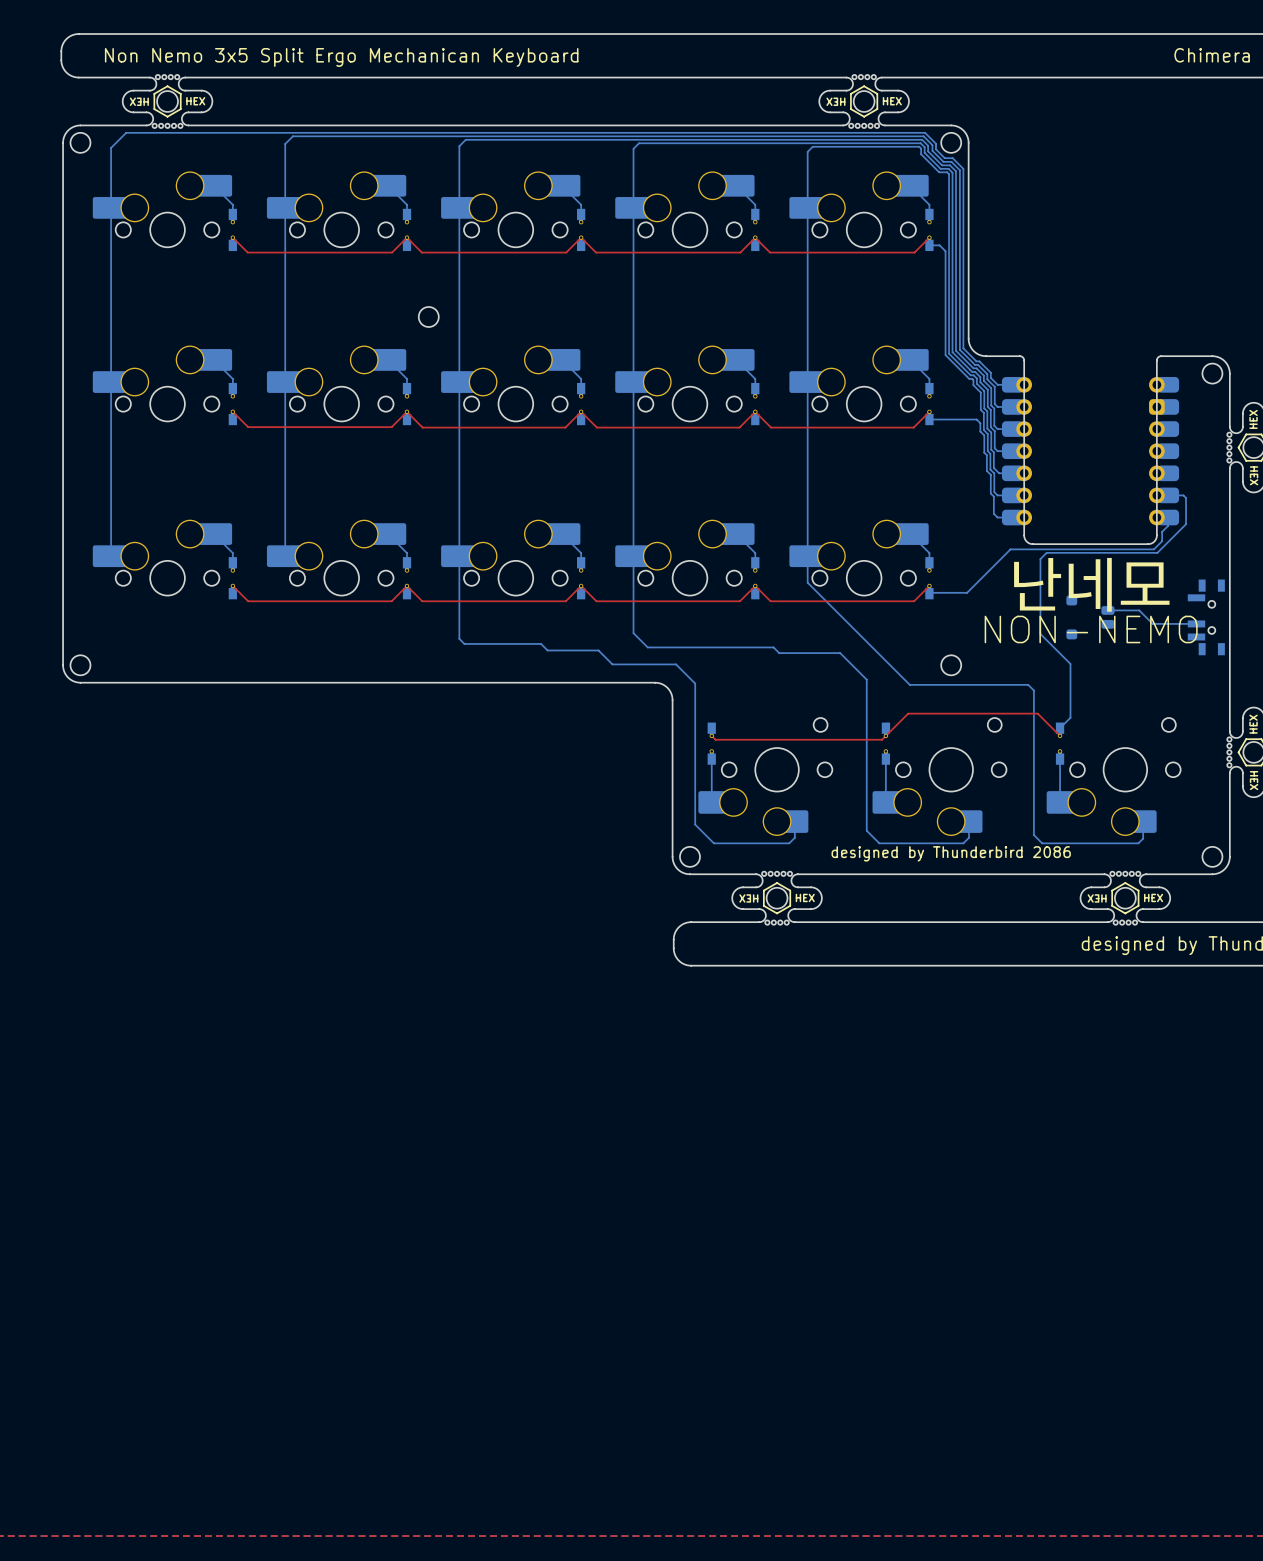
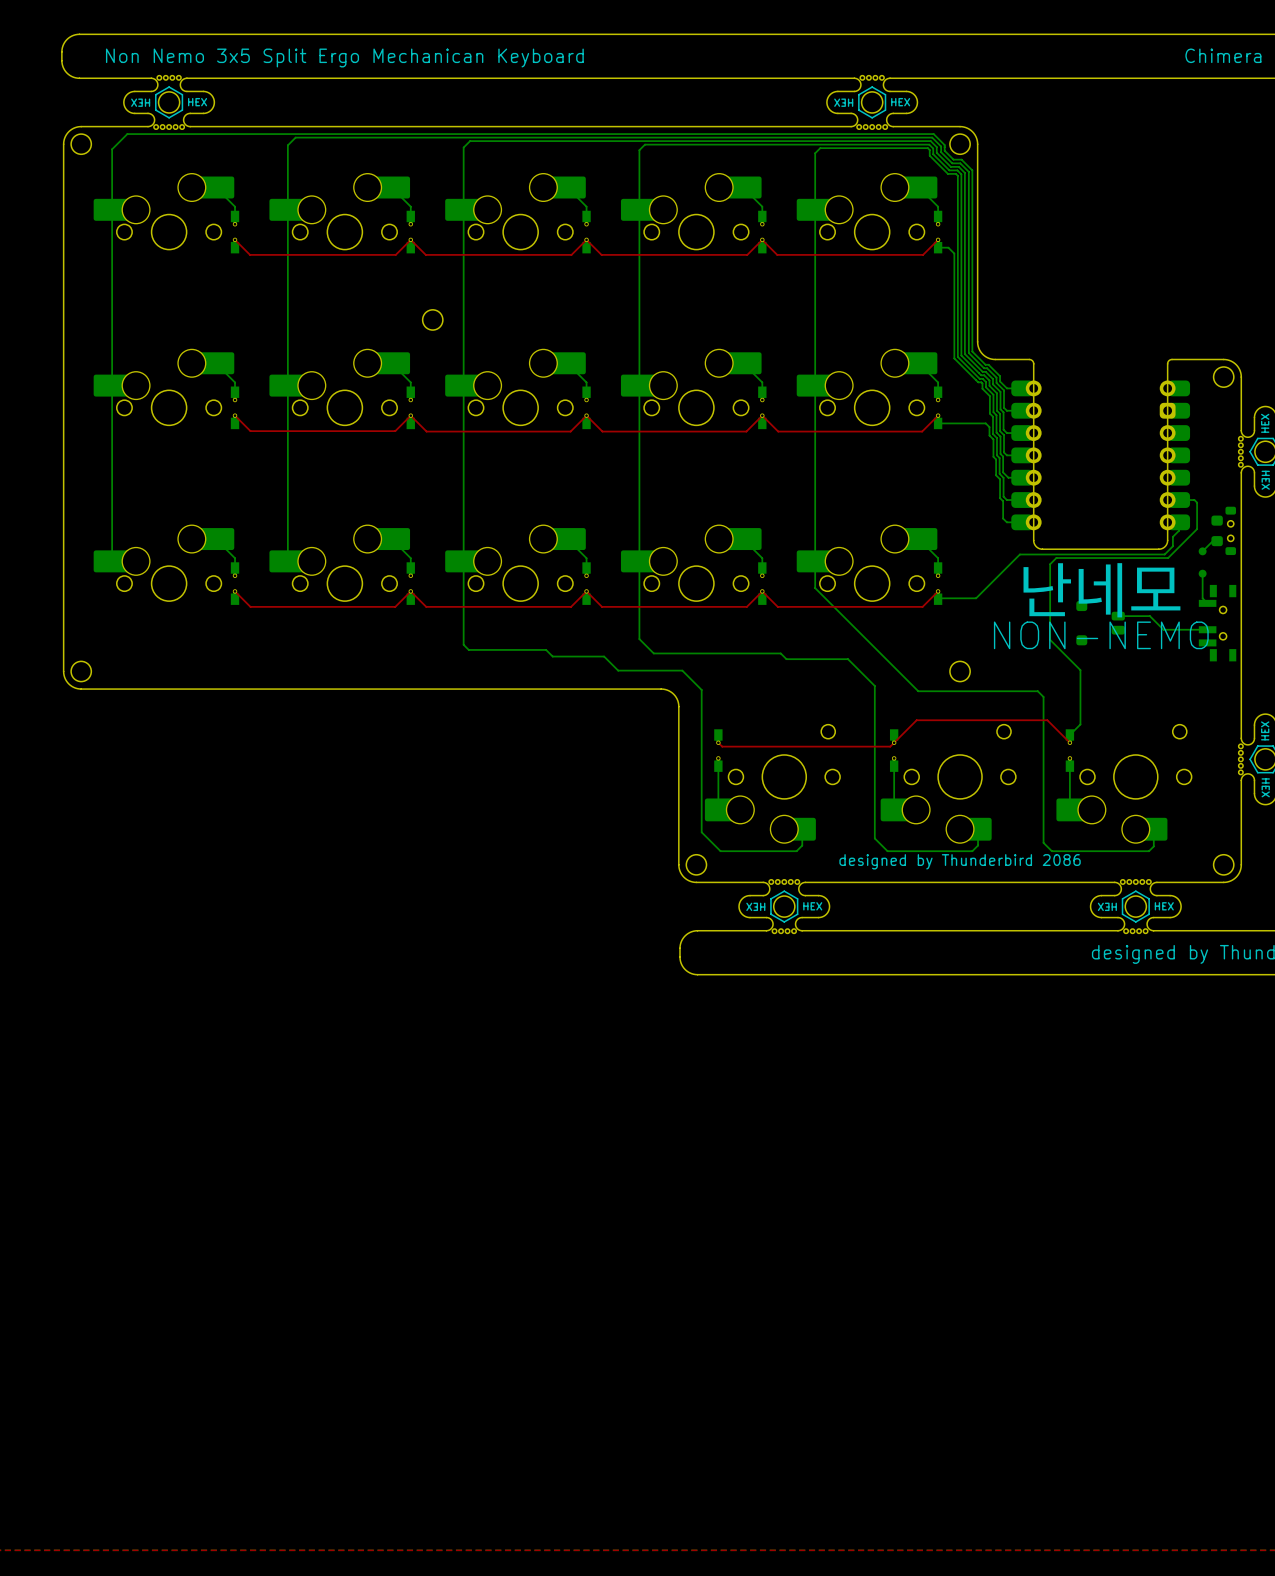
part: none -> (1223, 530)
bottom track: none -> (1217, 541) (1212, 541) (1202, 551)
part: none -> (1202, 562)
bottom track: none -> (1202, 573) (1202, 598) (1207, 603)

